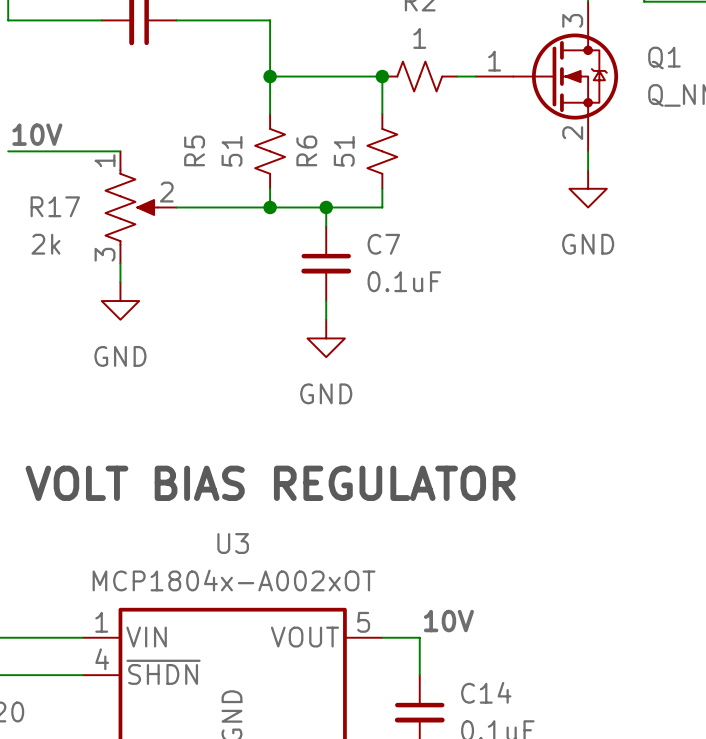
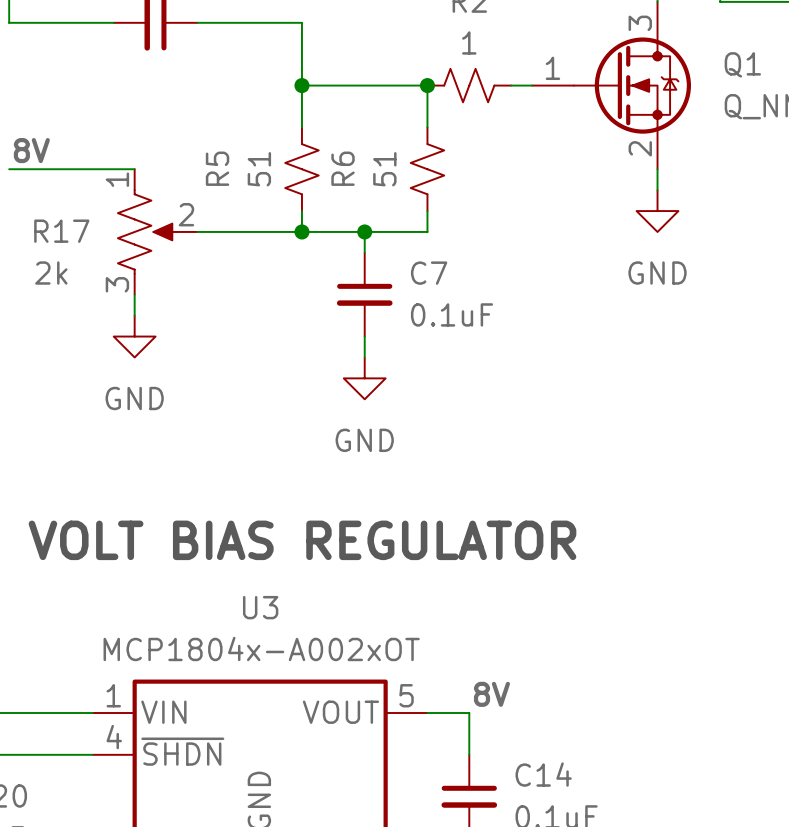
label: 10V (37, 134) -> 8V (31, 150)
label: 10V (448, 621) -> 8V (491, 694)

